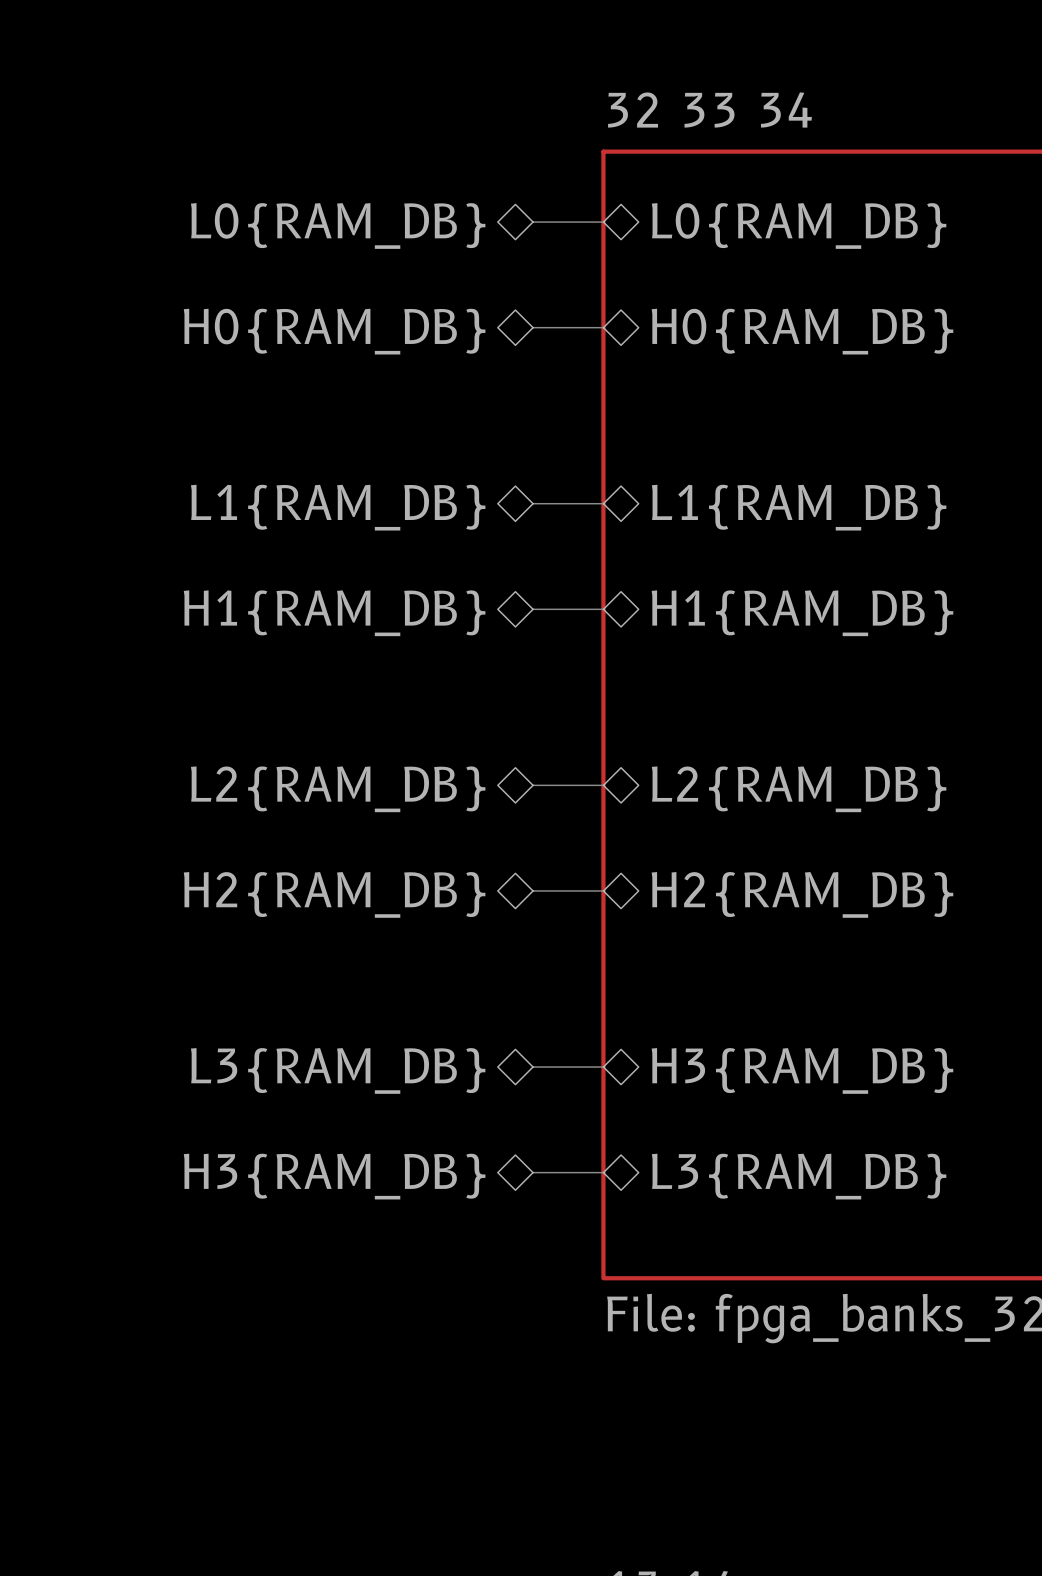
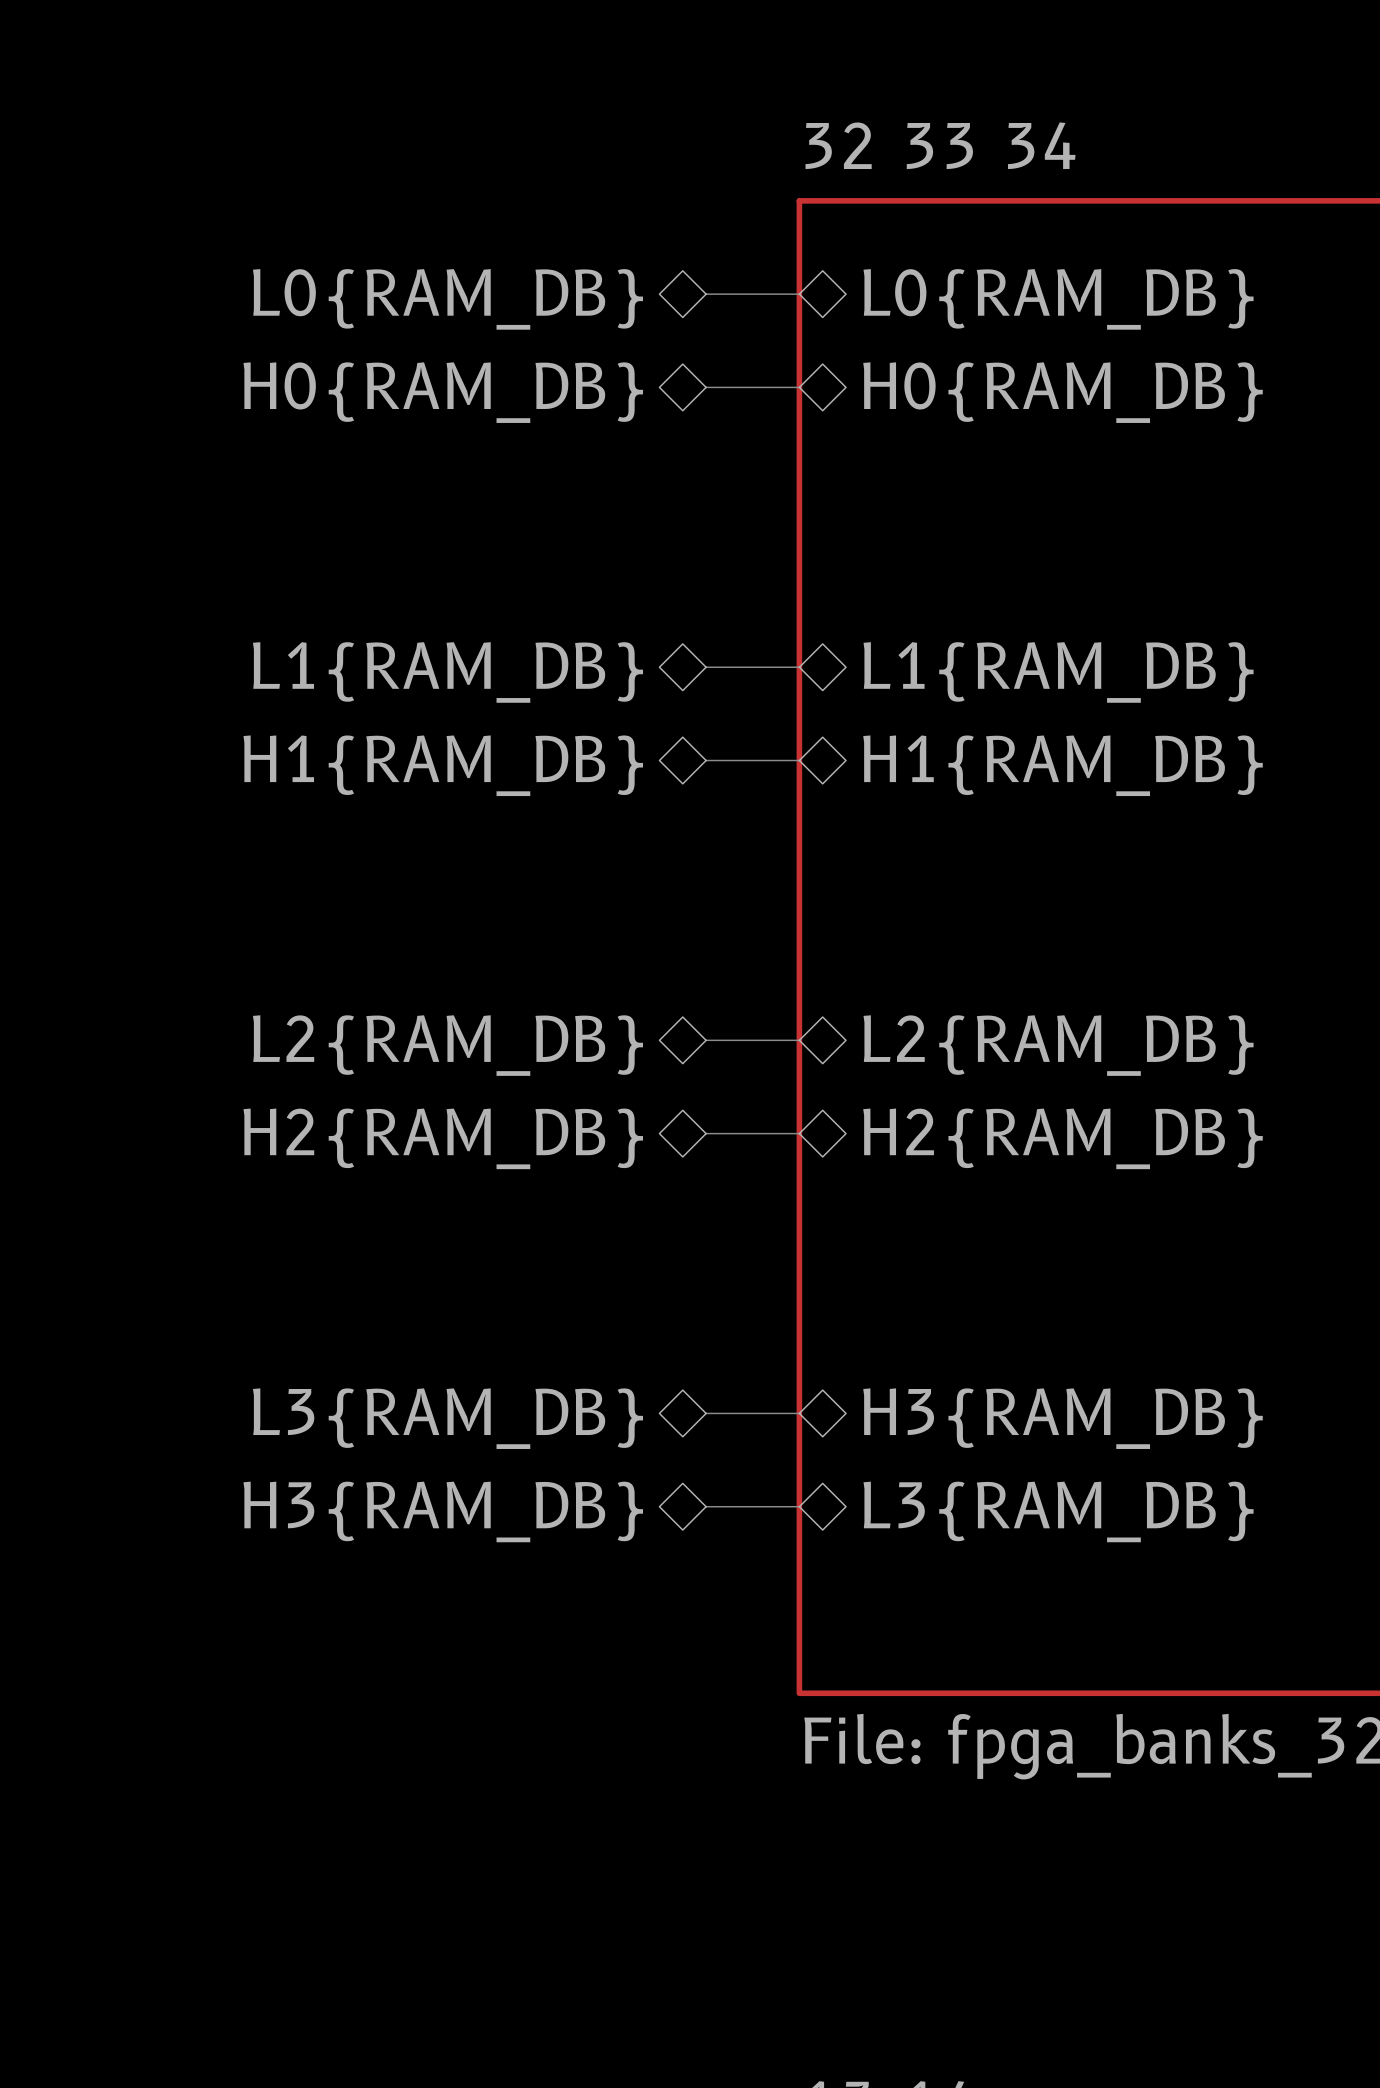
bus: (533, 327) (603, 327) -> (706, 387) (799, 387)
hierarchical label position: H0{RAM_DB} (334, 331) -> H0{RAM_DB} (443, 392)
sheet pin position: H0{RAM_DB} (802, 331) -> H0{RAM_DB} (1063, 392)
bus: (533, 609) (603, 609) -> (706, 760) (799, 760)
hierarchical label position: H1{RAM_DB} (334, 613) -> H1{RAM_DB} (443, 765)
sheet pin position: H1{RAM_DB} (802, 613) -> H1{RAM_DB} (1063, 765)
bus: (533, 890) (603, 890) -> (706, 1133) (799, 1133)
hierarchical label position: H2{RAM_DB} (334, 894) -> H2{RAM_DB} (443, 1138)
sheet pin position: H2{RAM_DB} (802, 894) -> H2{RAM_DB} (1063, 1138)
bus: (533, 1172) (603, 1172) -> (706, 1506) (799, 1506)
hierarchical label position: H3{RAM_DB} (334, 1176) -> H3{RAM_DB} (443, 1511)
sheet pin position: L3{RAM_DB} (799, 1176) -> L3{RAM_DB} (1058, 1511)

